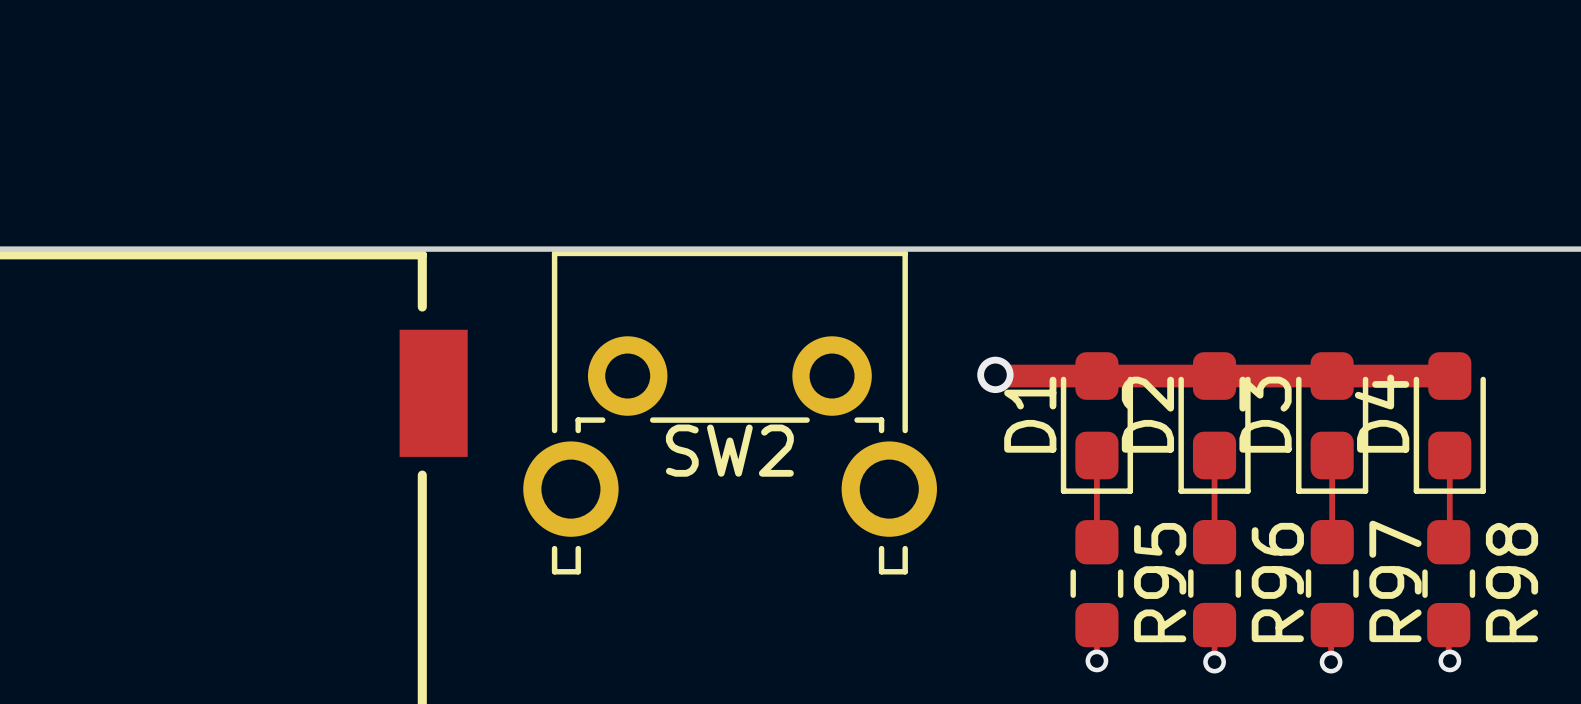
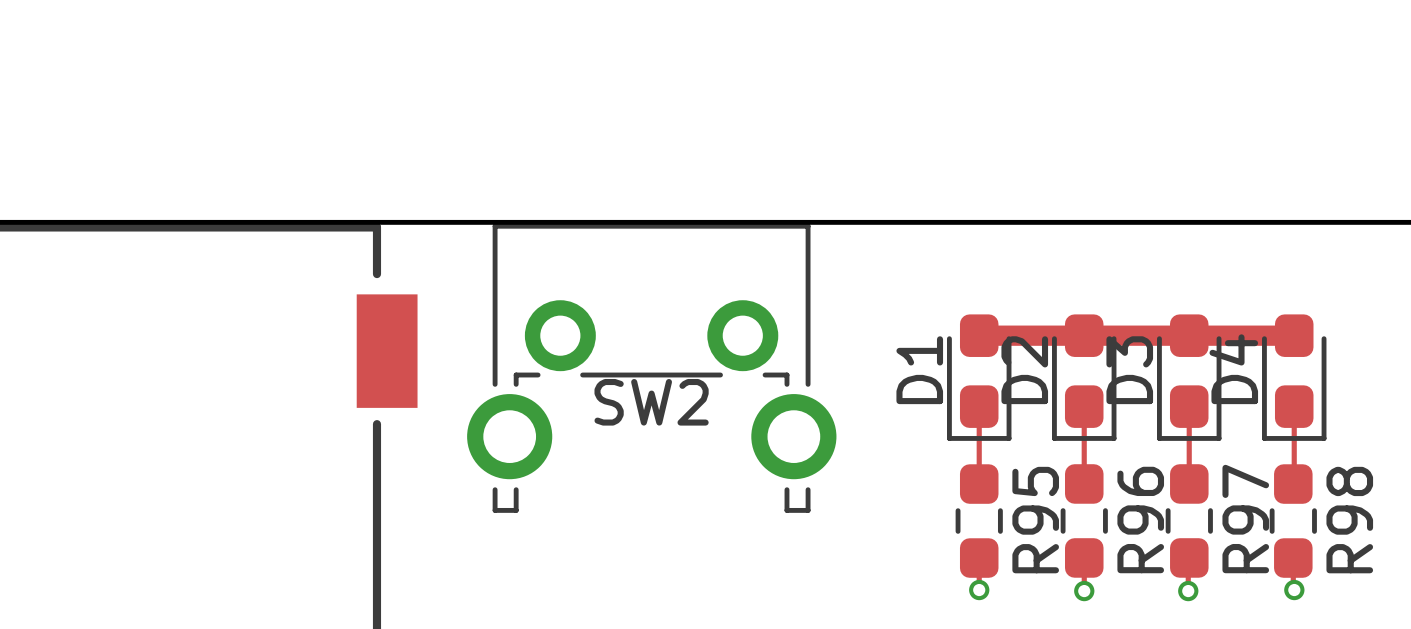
track: (995, 374) (1096, 376) -> none
via: (995, 374) -> none

